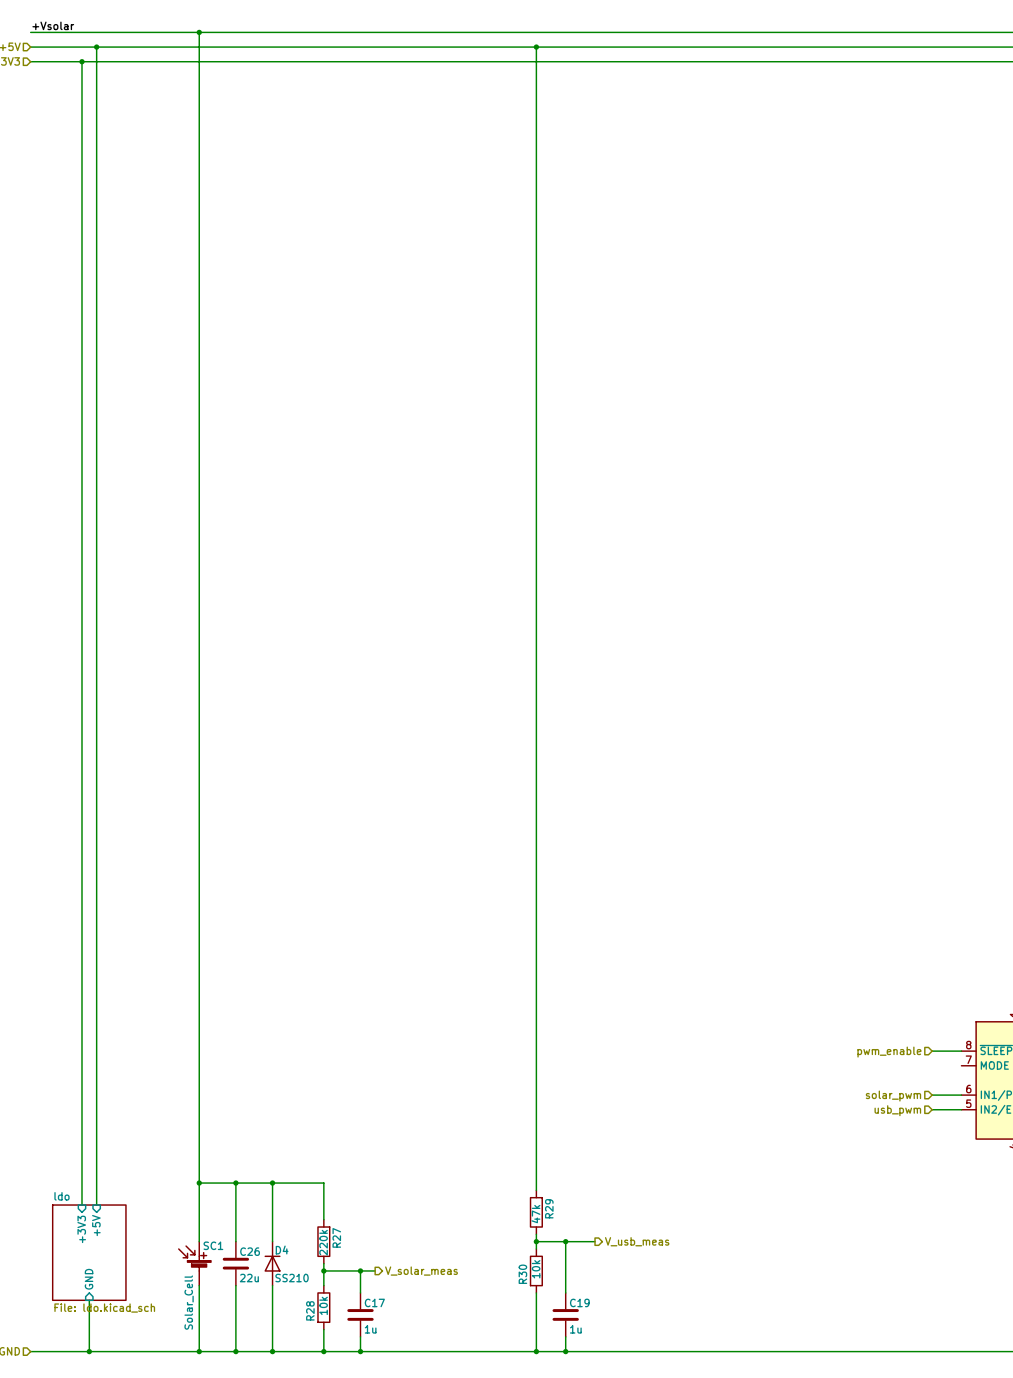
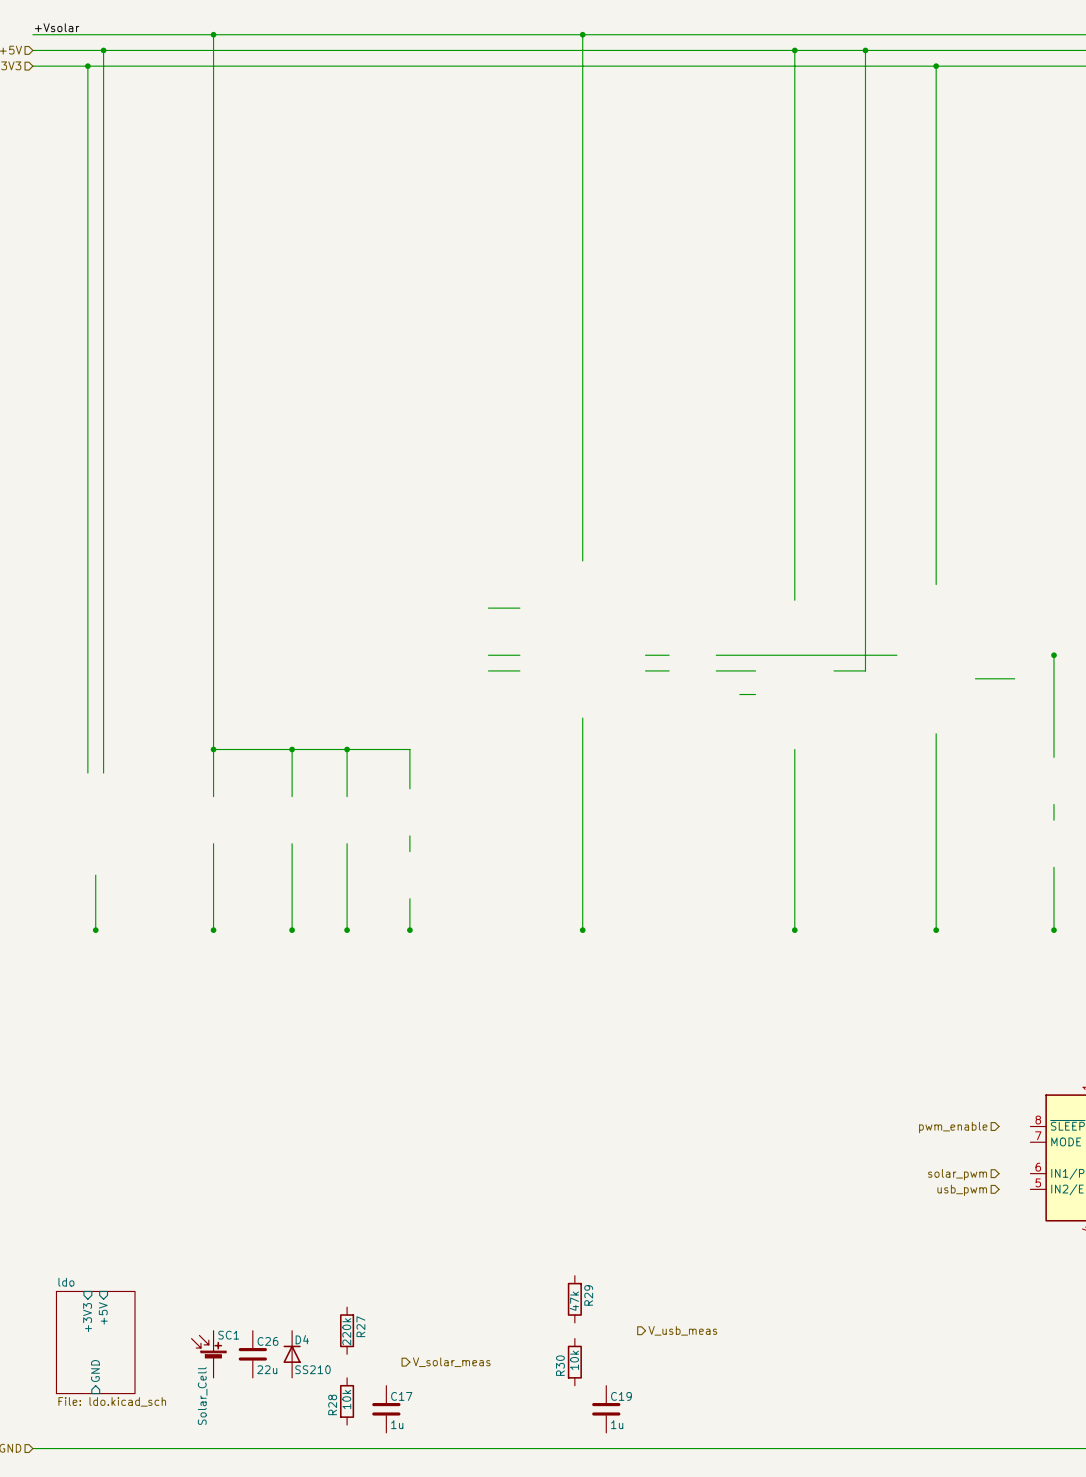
wire: none -> (582, 34) (582, 560)
wire: (536, 47) (536, 1190) -> none
junction position: (536, 47) -> (582, 34)
wire: none -> (794, 50) (794, 600)
junction: none -> (794, 50)
wire: none -> (865, 50) (865, 670) (834, 670)
junction: none -> (865, 50)
wire: none -> (936, 66) (936, 584)
junction: none -> (936, 66)
wire: none -> (488, 608) (519, 608)
wire: none -> (488, 655) (519, 655)
wire: none -> (645, 655) (669, 655)
wire: none -> (716, 655) (896, 655)
wire: none -> (1053, 655) (1053, 757)
junction: none -> (1053, 655)
wire: none -> (488, 670) (519, 670)
wire: none -> (645, 670) (669, 670)
wire: none -> (716, 670) (755, 670)
wire: none -> (975, 678) (1014, 678)
wire: none -> (739, 694) (755, 694)
wire: none -> (582, 718) (582, 930)
wire: none -> (936, 733) (936, 930)
wire: none -> (213, 749) (409, 749) (409, 788)
junction: none -> (213, 749)
junction: none -> (292, 749)
wire: none -> (347, 749) (347, 796)
junction: none -> (347, 749)
wire: none -> (794, 749) (794, 930)
wire: (81, 721) (81, 1205) -> none
wire: (96, 721) (96, 1205) -> none
wire: (199, 743) (199, 787) -> (292, 749) (292, 796)
wire: none -> (1053, 804) (1053, 820)
wire: none -> (409, 835) (409, 851)
wire: none -> (292, 843) (292, 930)
wire: none -> (347, 843) (347, 930)
wire: none -> (1053, 867) (1053, 930)
wire: none -> (95, 875) (95, 930)
wire: none -> (409, 898) (409, 930)
junction: none -> (95, 930)
wire: (199, 867) (199, 1241) -> none
junction: none -> (213, 930)
junction: none -> (292, 930)
junction: none -> (347, 930)
junction: none -> (409, 930)
junction: none -> (582, 930)
junction: none -> (794, 930)
junction: none -> (936, 930)
junction: none -> (1053, 930)
wire: (932, 1051) (961, 1051) -> none
wire: (932, 1095) (961, 1095) -> none
wire: (932, 1109) (961, 1109) -> none
wire: (199, 1183) (323, 1183) (323, 1219) -> none
junction: (199, 1183) -> none
wire: (235, 1183) (235, 1241) -> none
junction: (235, 1183) -> none
wire: (272, 1183) (272, 1241) -> none
junction: (272, 1183) -> none
wire: (536, 1234) (536, 1248) -> none
wire: (536, 1241) (595, 1241) -> none
junction: (536, 1241) -> none
wire: (565, 1241) (565, 1292) -> none
junction: (565, 1241) -> none
wire: (323, 1263) (323, 1285) -> none
wire: (323, 1270) (375, 1270) -> none
junction: (323, 1270) -> none
wire: (360, 1270) (360, 1292) -> none
junction: (360, 1270) -> none
wire: (199, 1285) (199, 1351) -> none
wire: (235, 1285) (235, 1351) -> none
wire: (272, 1285) (272, 1351) -> none
wire: (536, 1292) (536, 1351) -> none
wire: (89, 1300) (89, 1351) -> none
wire: (323, 1329) (323, 1351) -> none
wire: (360, 1336) (360, 1351) -> none
wire: (565, 1336) (565, 1351) -> none
junction: (89, 1351) -> none
junction: (199, 1351) -> none
junction: (235, 1351) -> none
junction: (272, 1351) -> none
junction: (323, 1351) -> none
junction: (360, 1351) -> none
junction: (536, 1351) -> none
junction: (565, 1351) -> none

